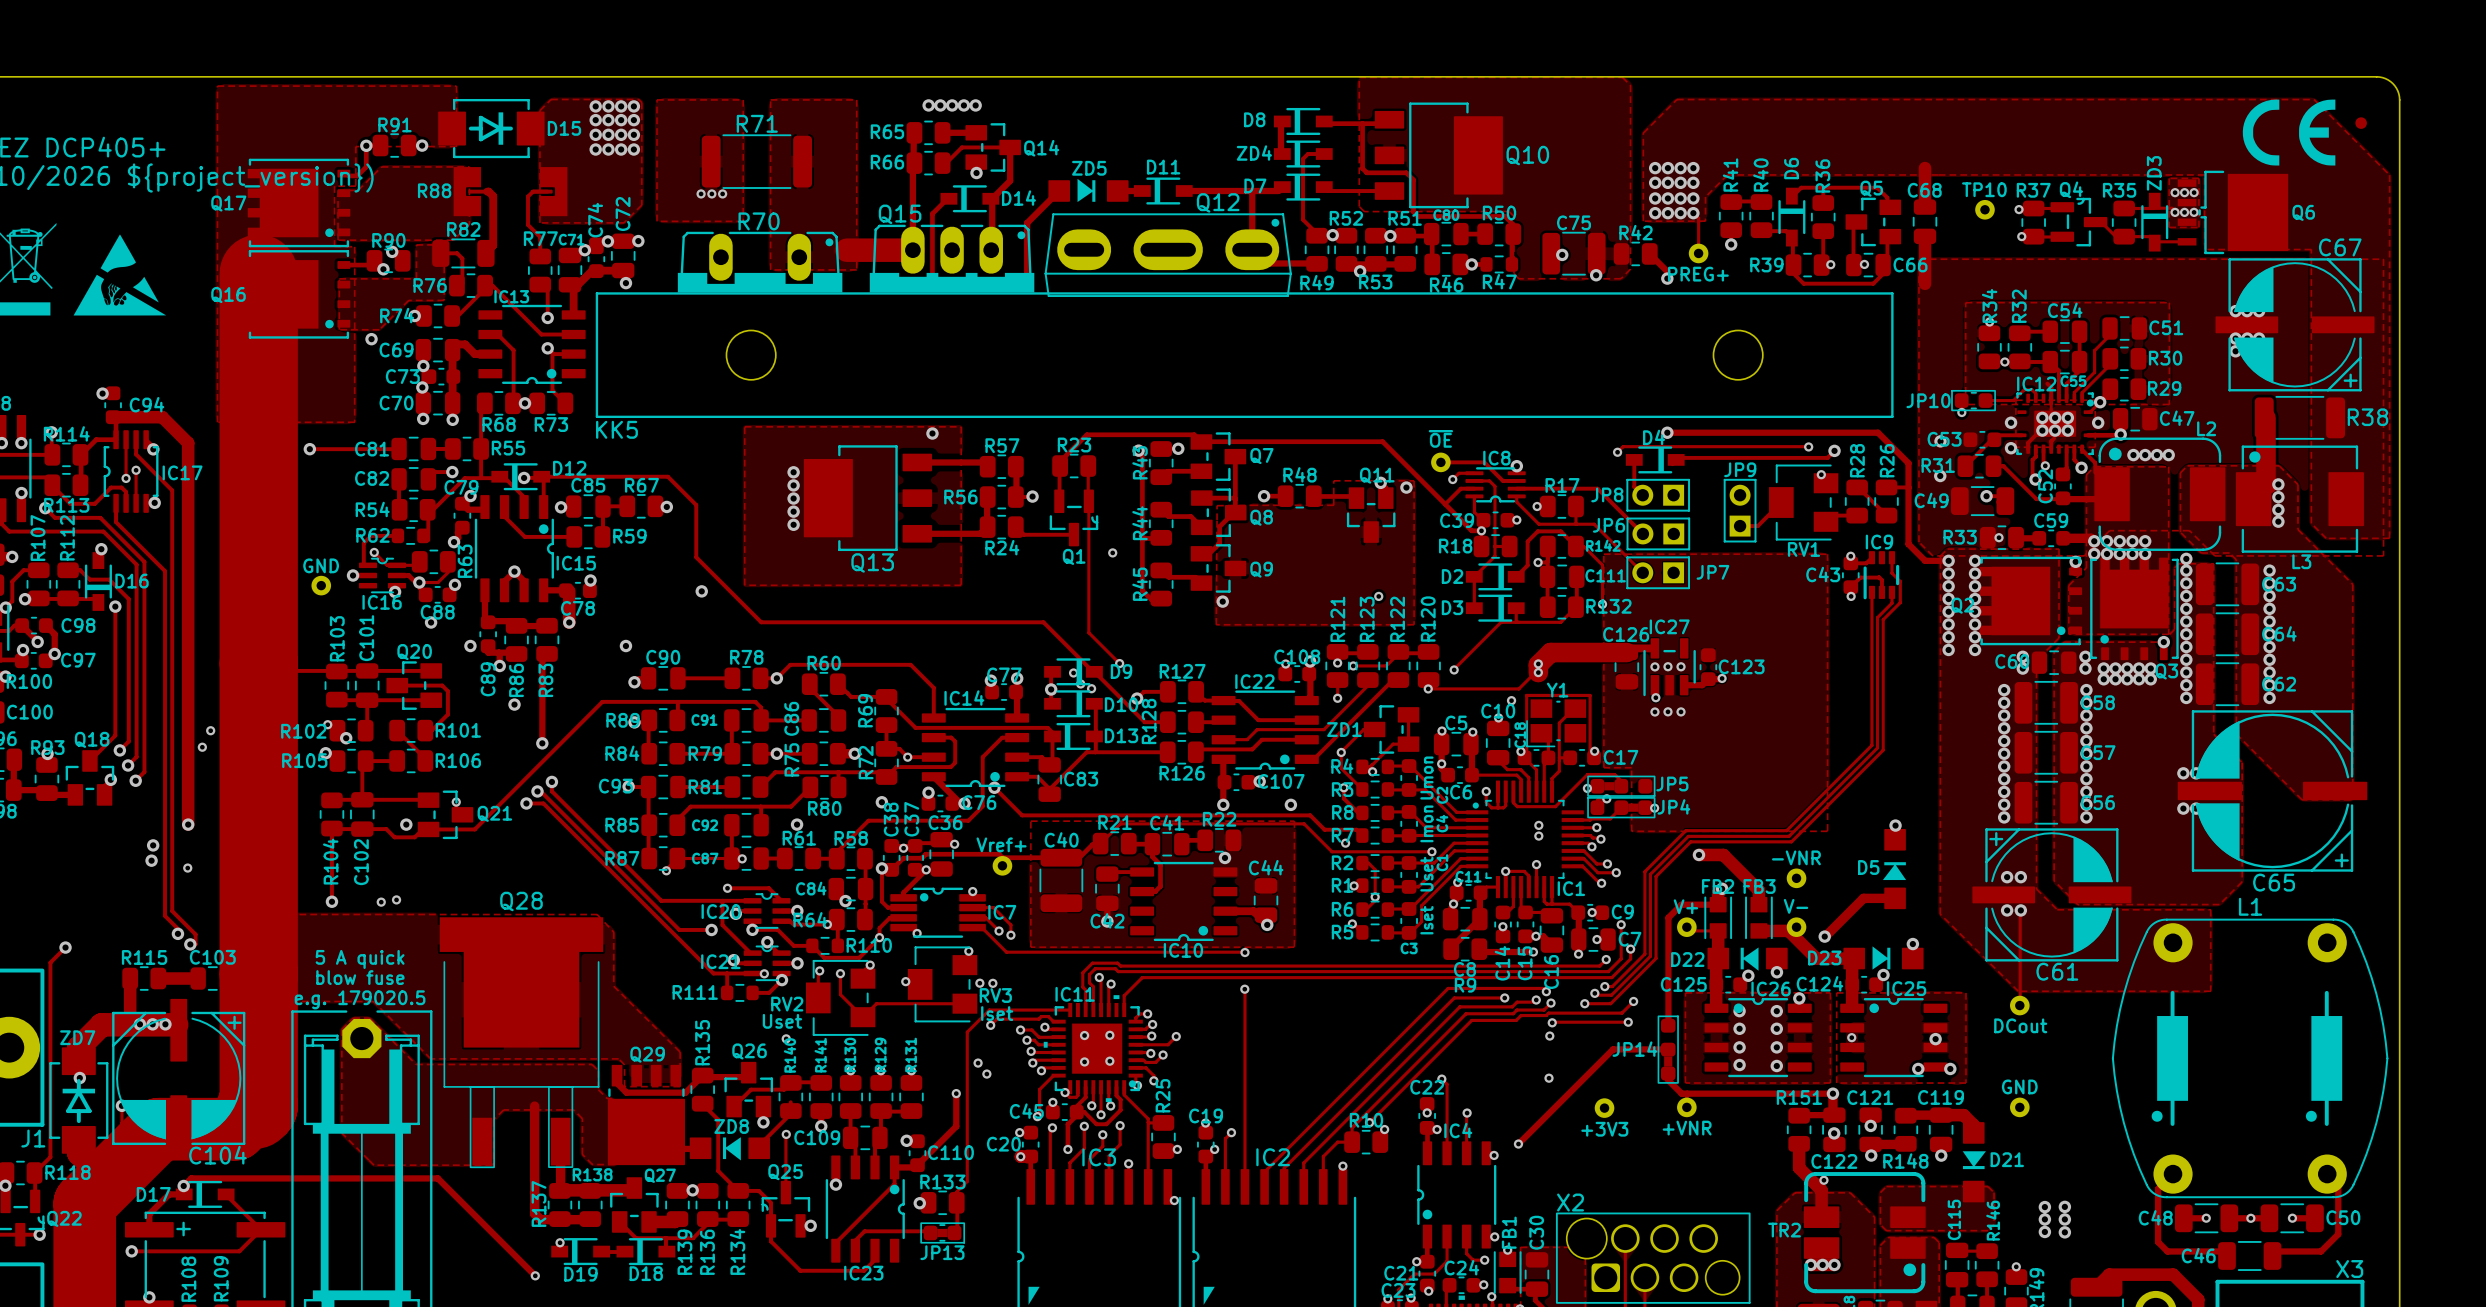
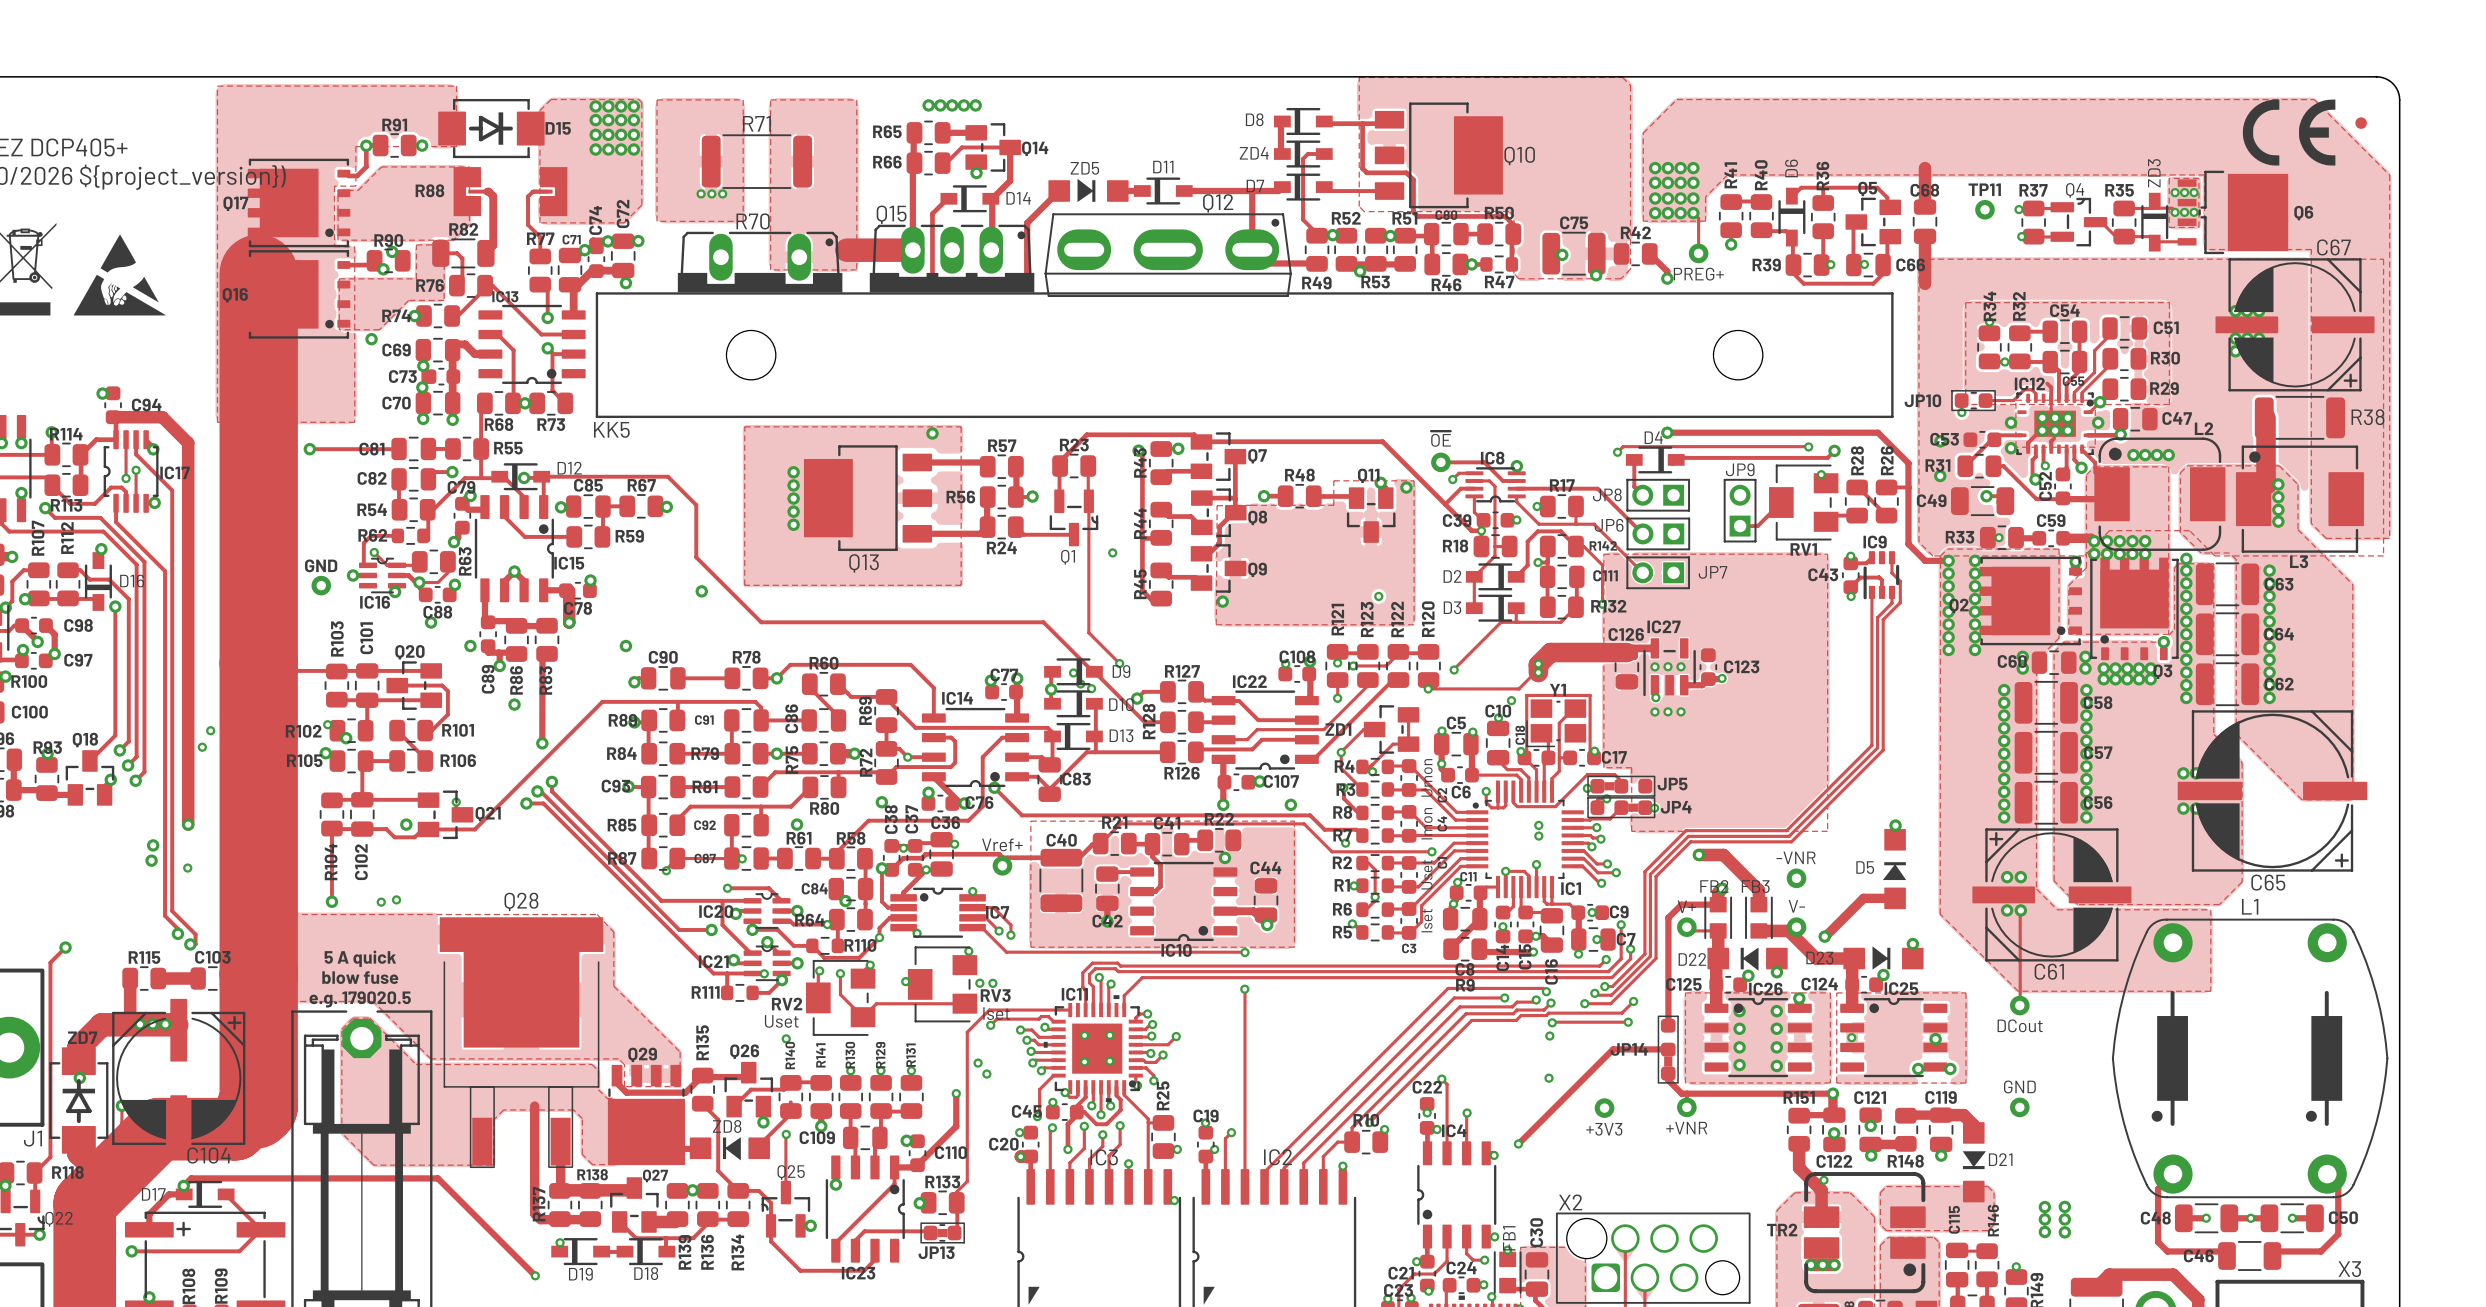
TP10 name: TP10 (1984, 189) -> TP11 (1984, 189)

